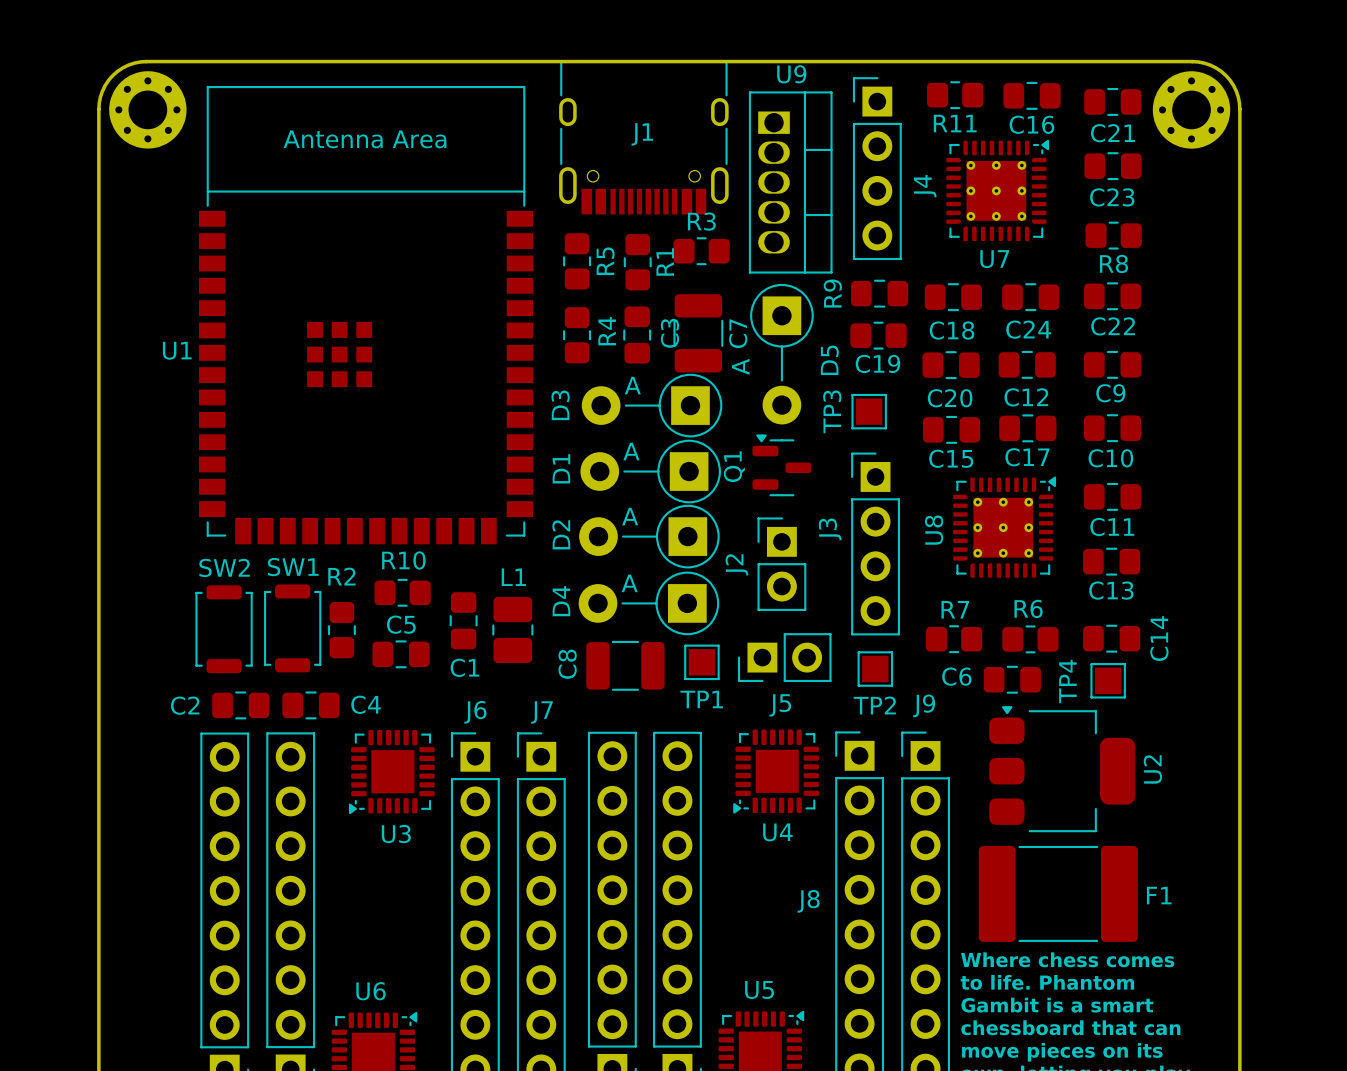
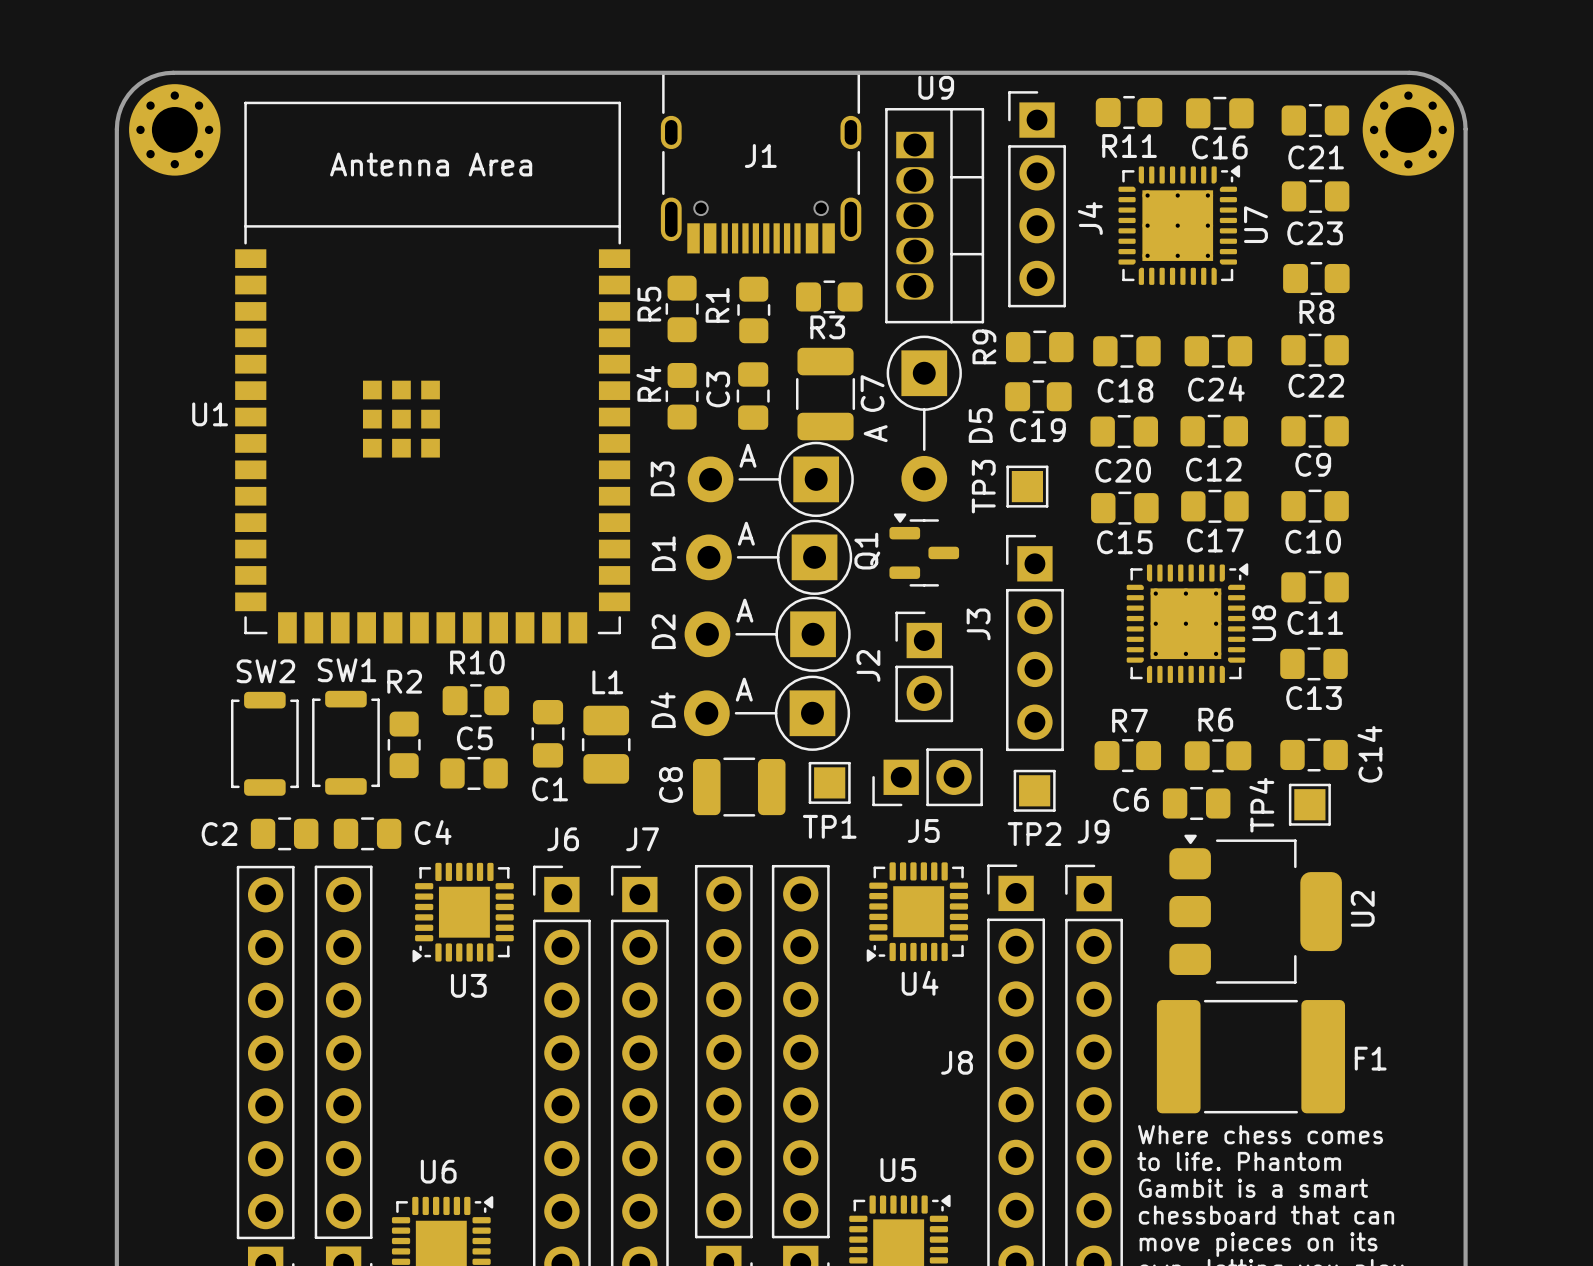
R3 name position: R3 (701, 221) -> R3 (827, 327)
U7 name rotation: 0° (994, 259) -> 90° counterclockwise (1255, 224)
U7 name position: U7 (994, 259) -> U7 (1255, 224)
R5 name position: R5 (605, 261) -> R5 (649, 304)
R1 name position: R1 (665, 261) -> R1 (717, 305)
R4 name position: R4 (607, 331) -> R4 (648, 383)
C3 name position: C3 (669, 333) -> C3 (718, 389)
U8 name position: U8 (934, 530) -> U8 (1264, 623)

